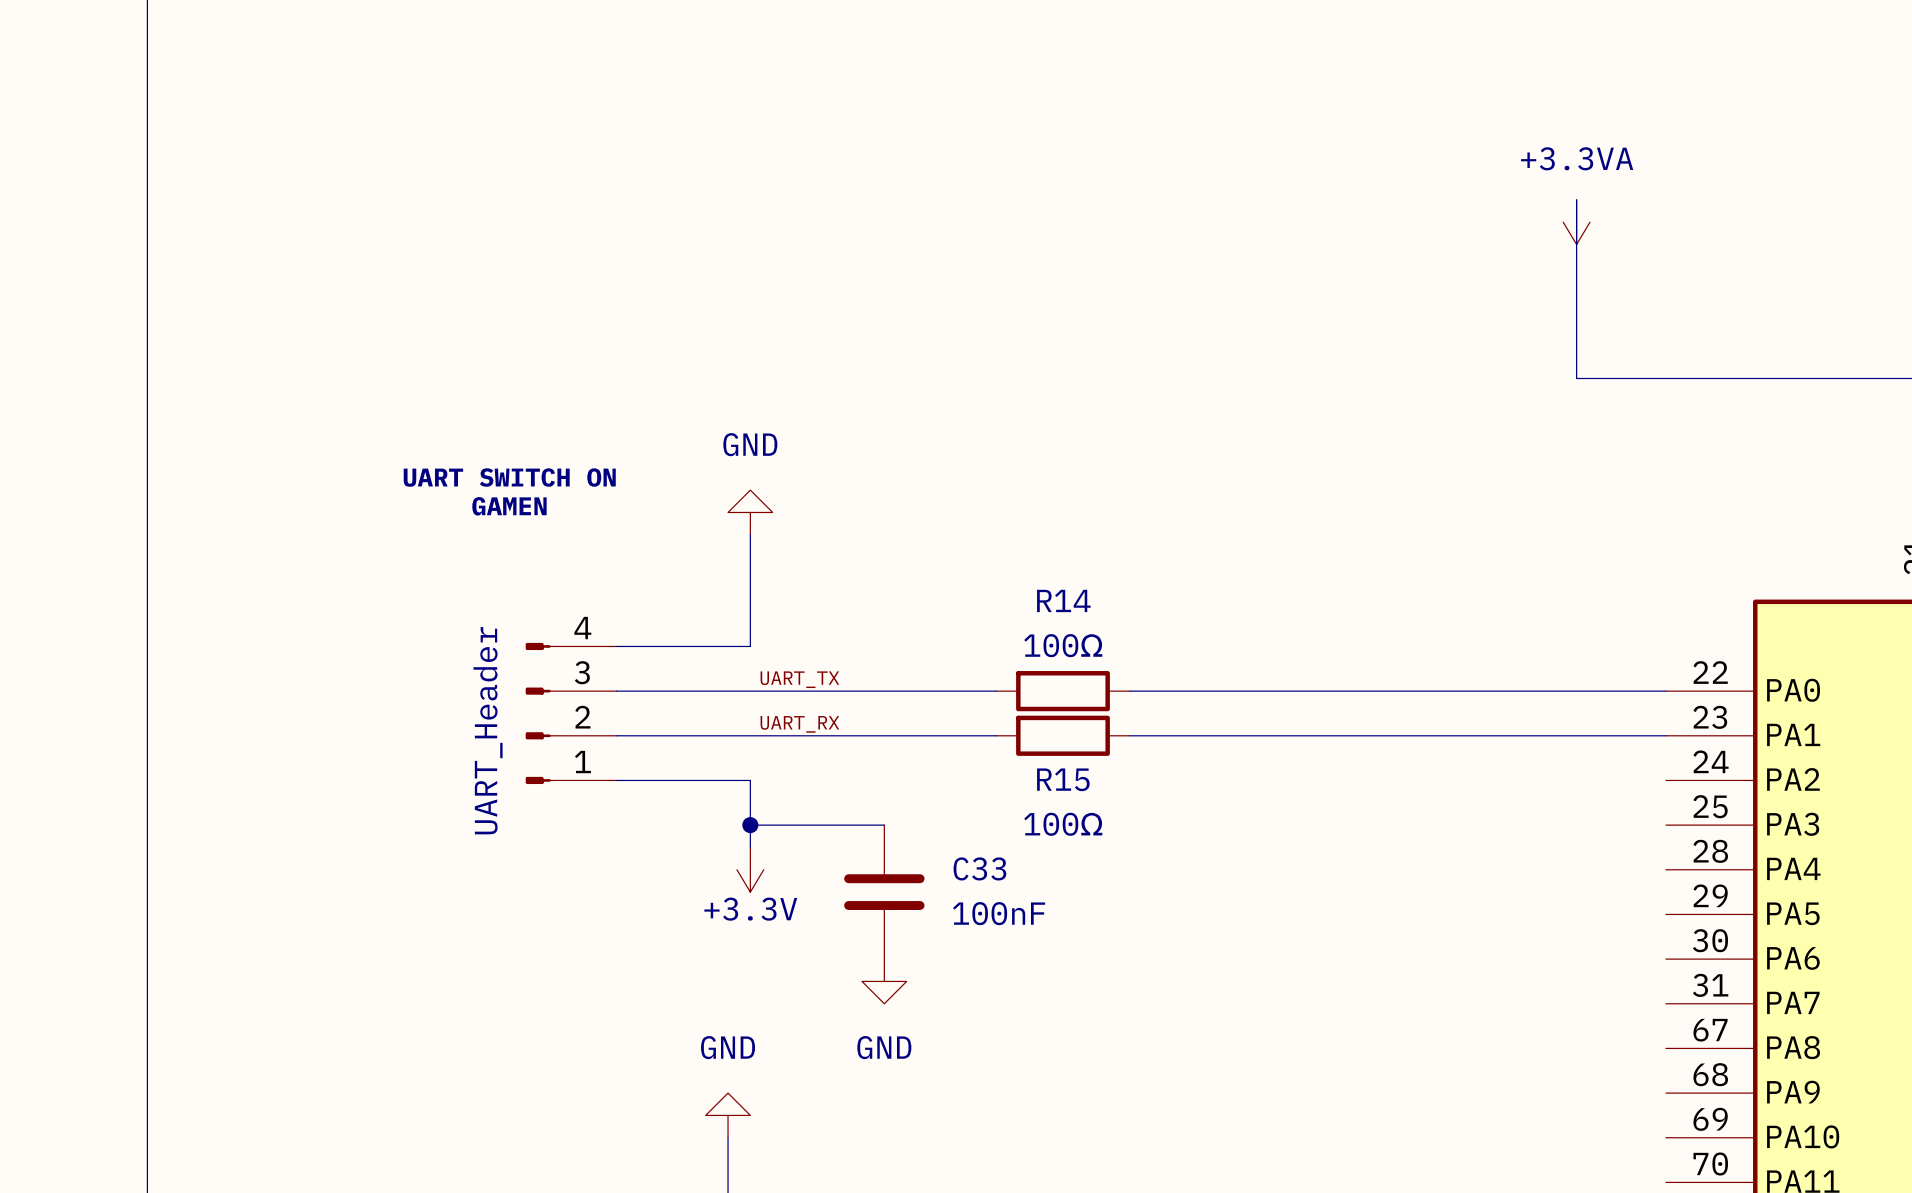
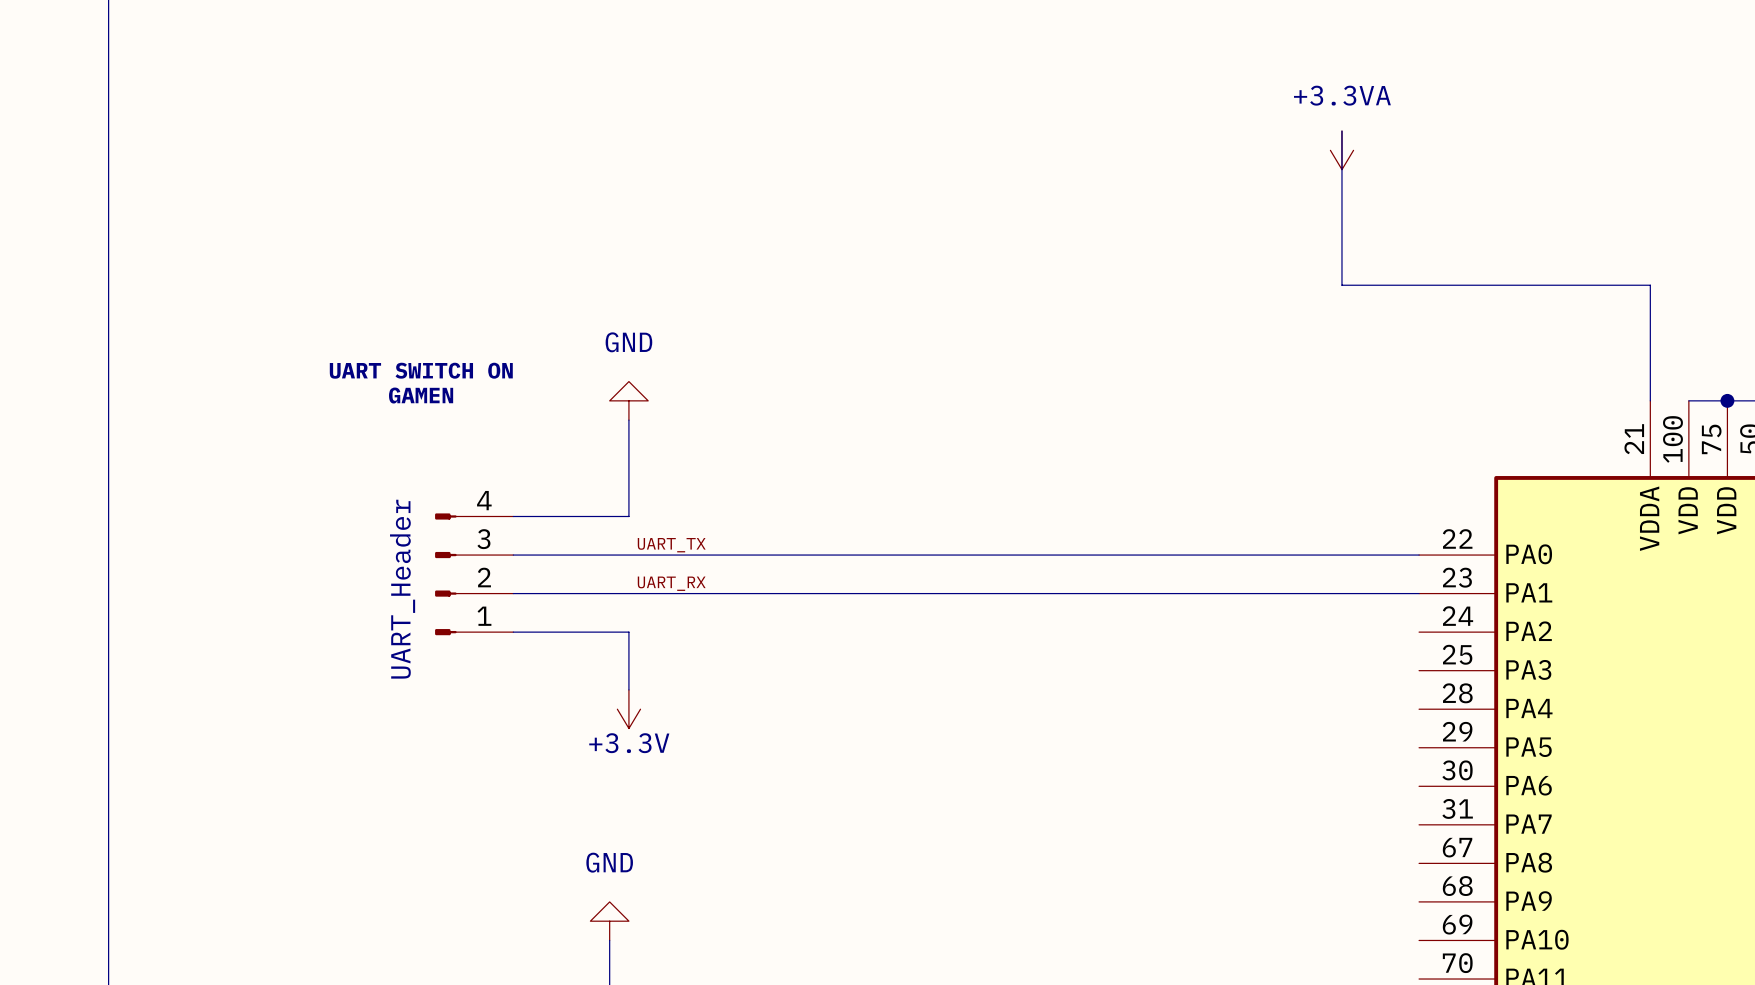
wire: none -> (840, 555) (956, 555)
R14: 100Ω (1062, 691) -> none
R15: 100Ω (1062, 735) -> none
wire: (750, 825) (884, 825) -> (840, 593) (956, 593)
junction: (750, 825) -> none
C33: 100nF (884, 892) -> none
power symbol: GND (884, 981) -> none

